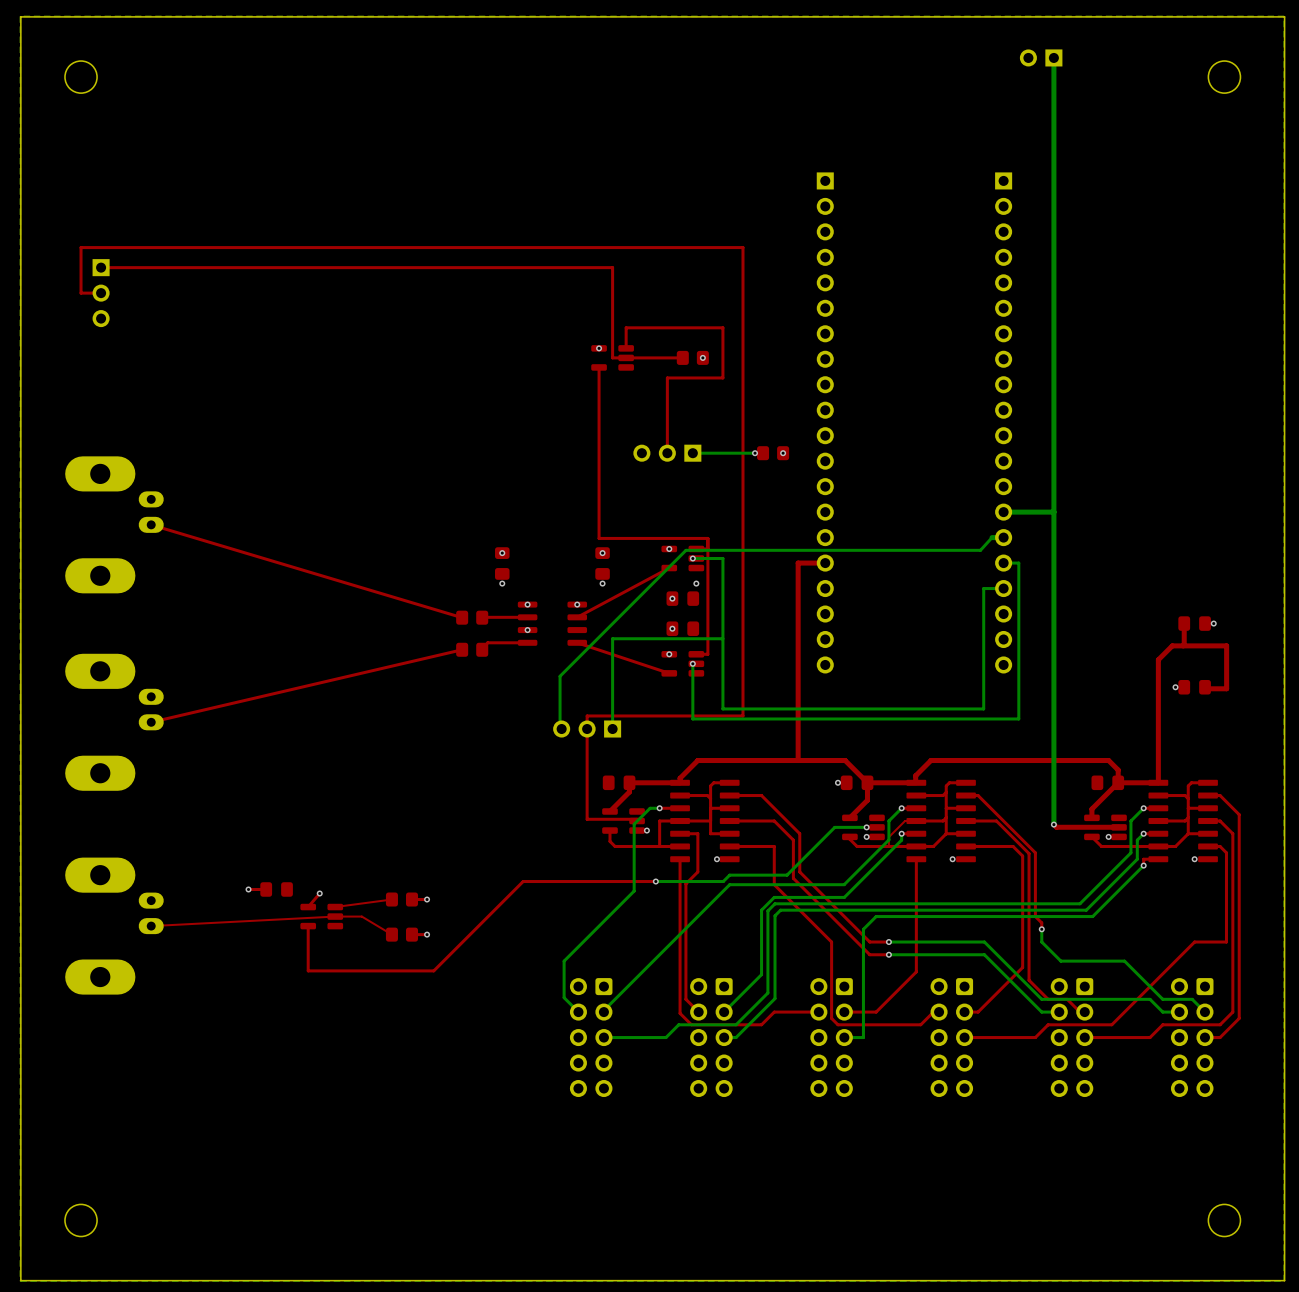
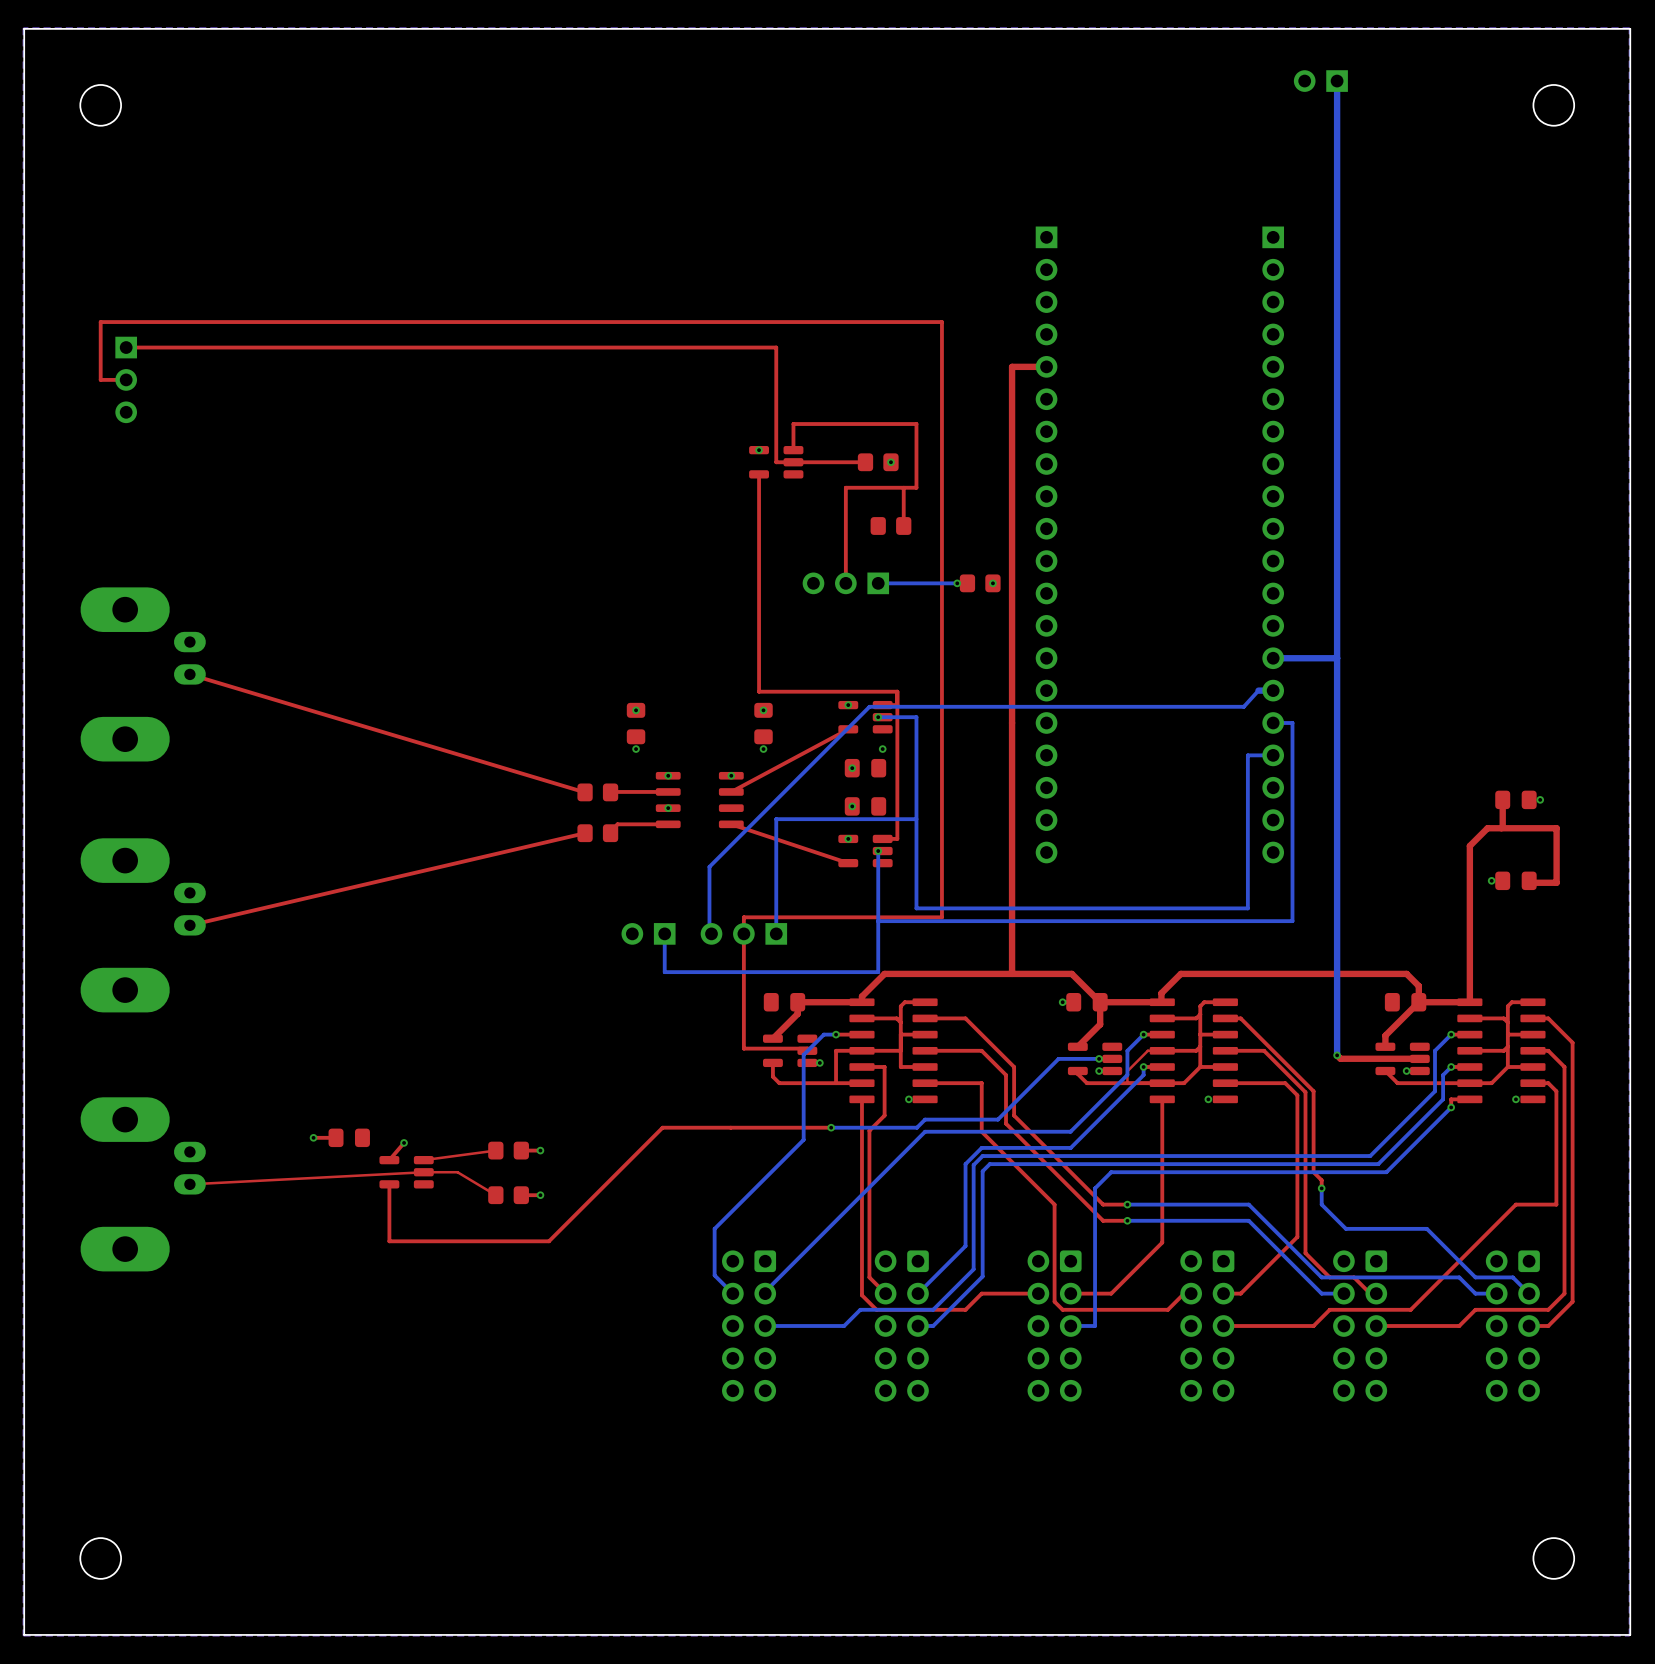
top track: none -> (903, 487) (903, 525)
part: none -> (890, 525)
top track: (825, 563) (798, 563) -> (1046, 366) (1012, 366) (1012, 722)
bottom track: none -> (878, 921) (878, 972) (664, 972) (664, 933)
part: none -> (648, 933)

